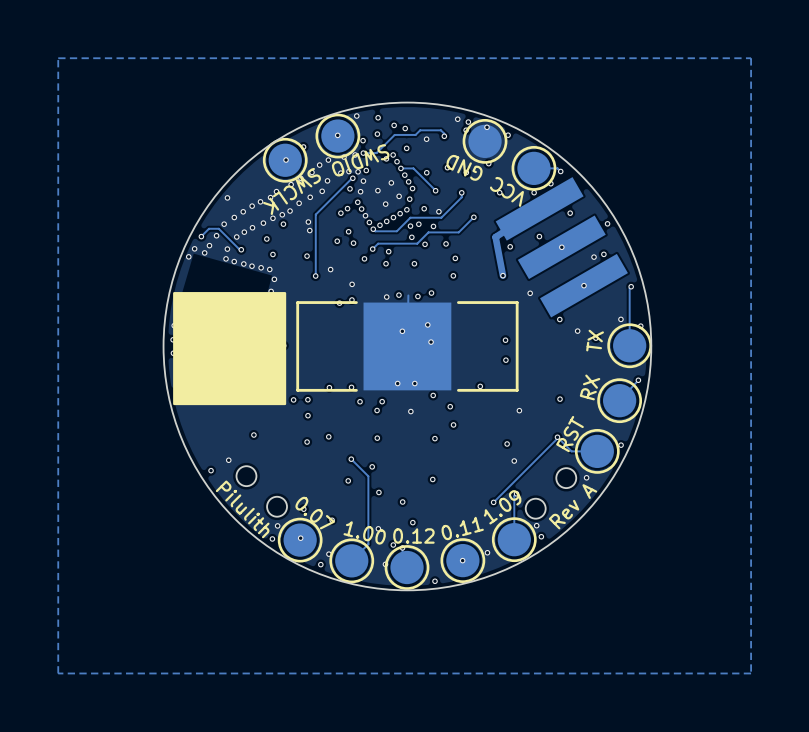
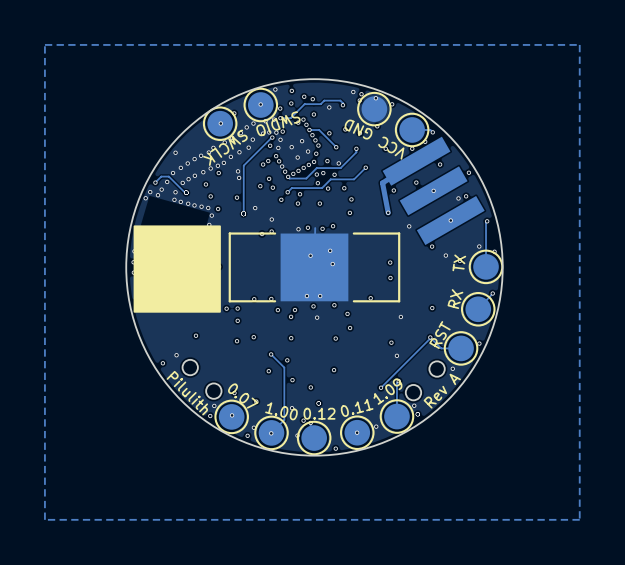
via: none -> (186, 192)
via: none -> (218, 209)
via: none -> (243, 213)
via: none -> (313, 306)
via: none -> (318, 403)
via: none -> (417, 414)
via: none -> (271, 433)

